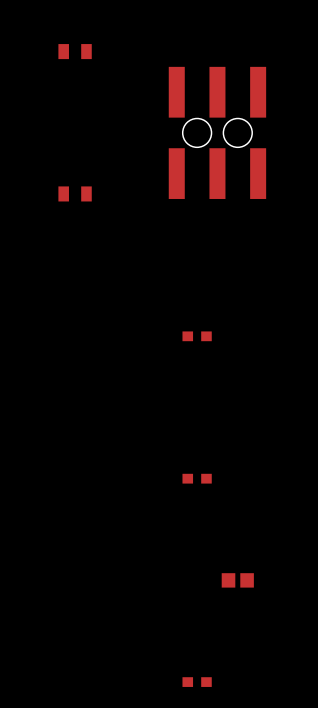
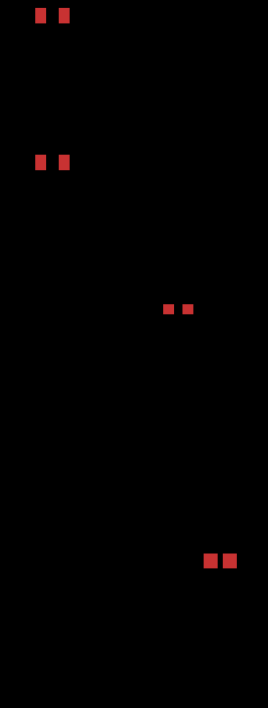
part: (217, 132) -> none
part: (197, 478) -> none
part: (197, 682) -> none

